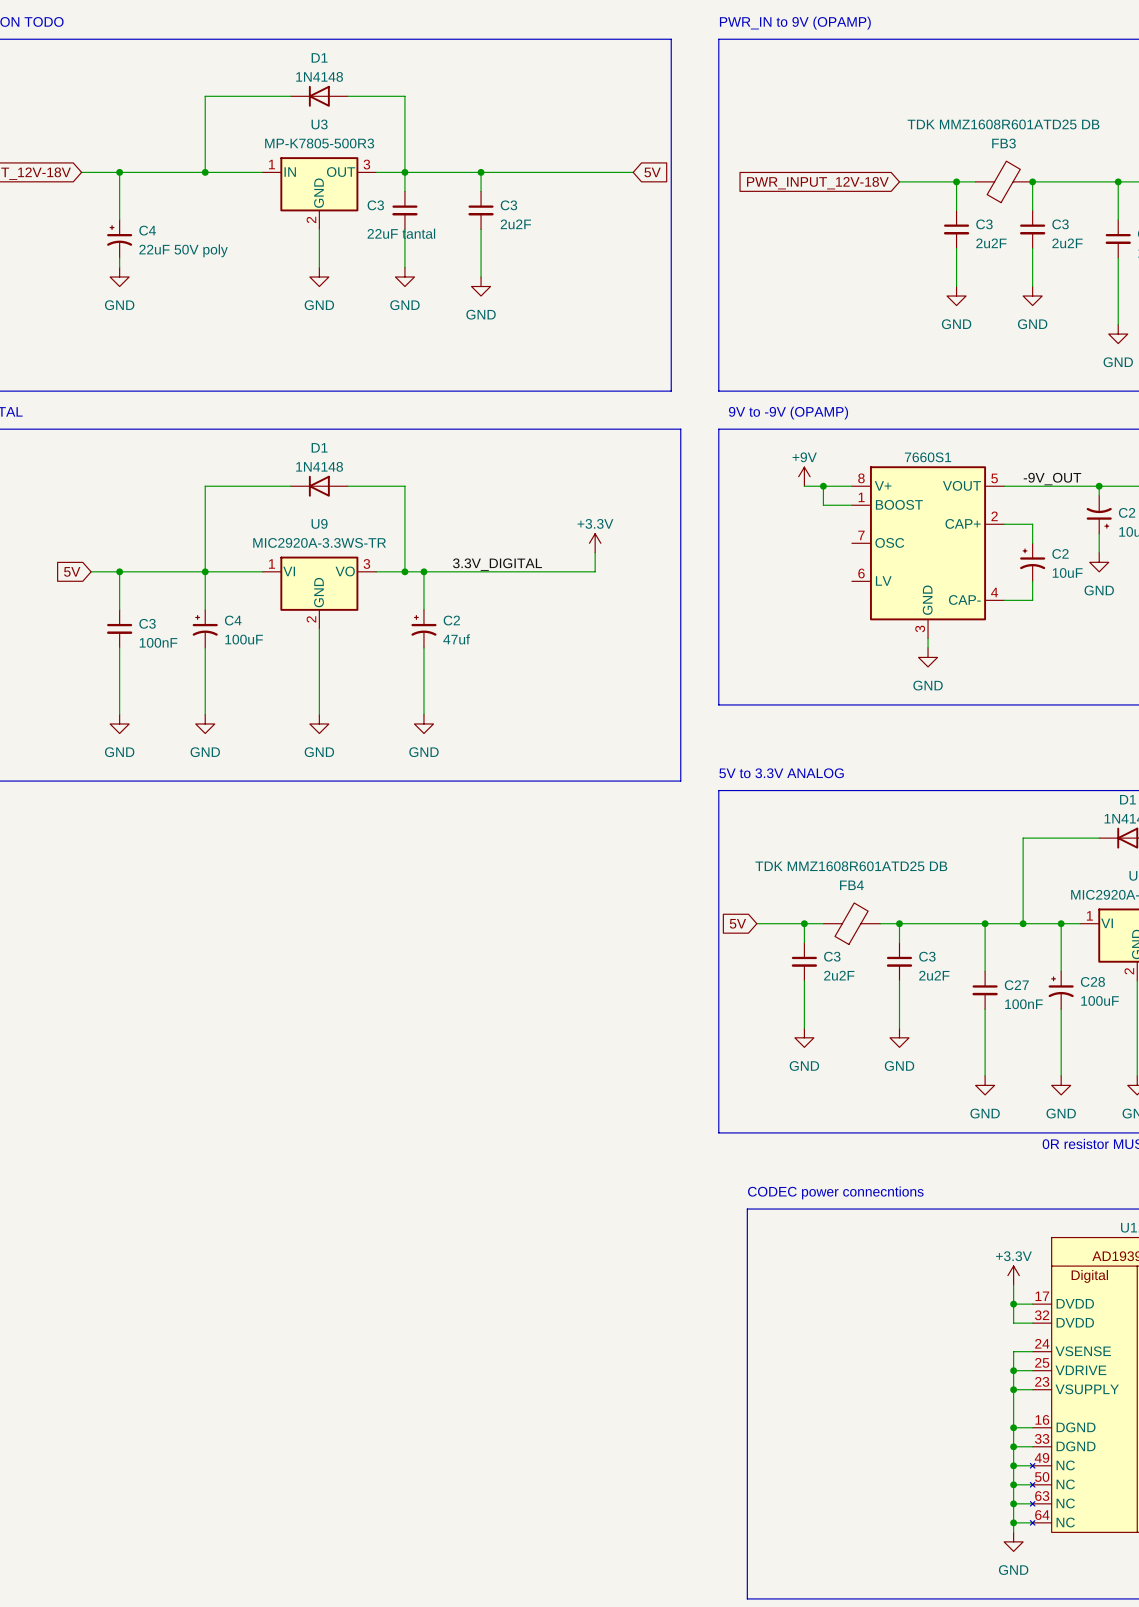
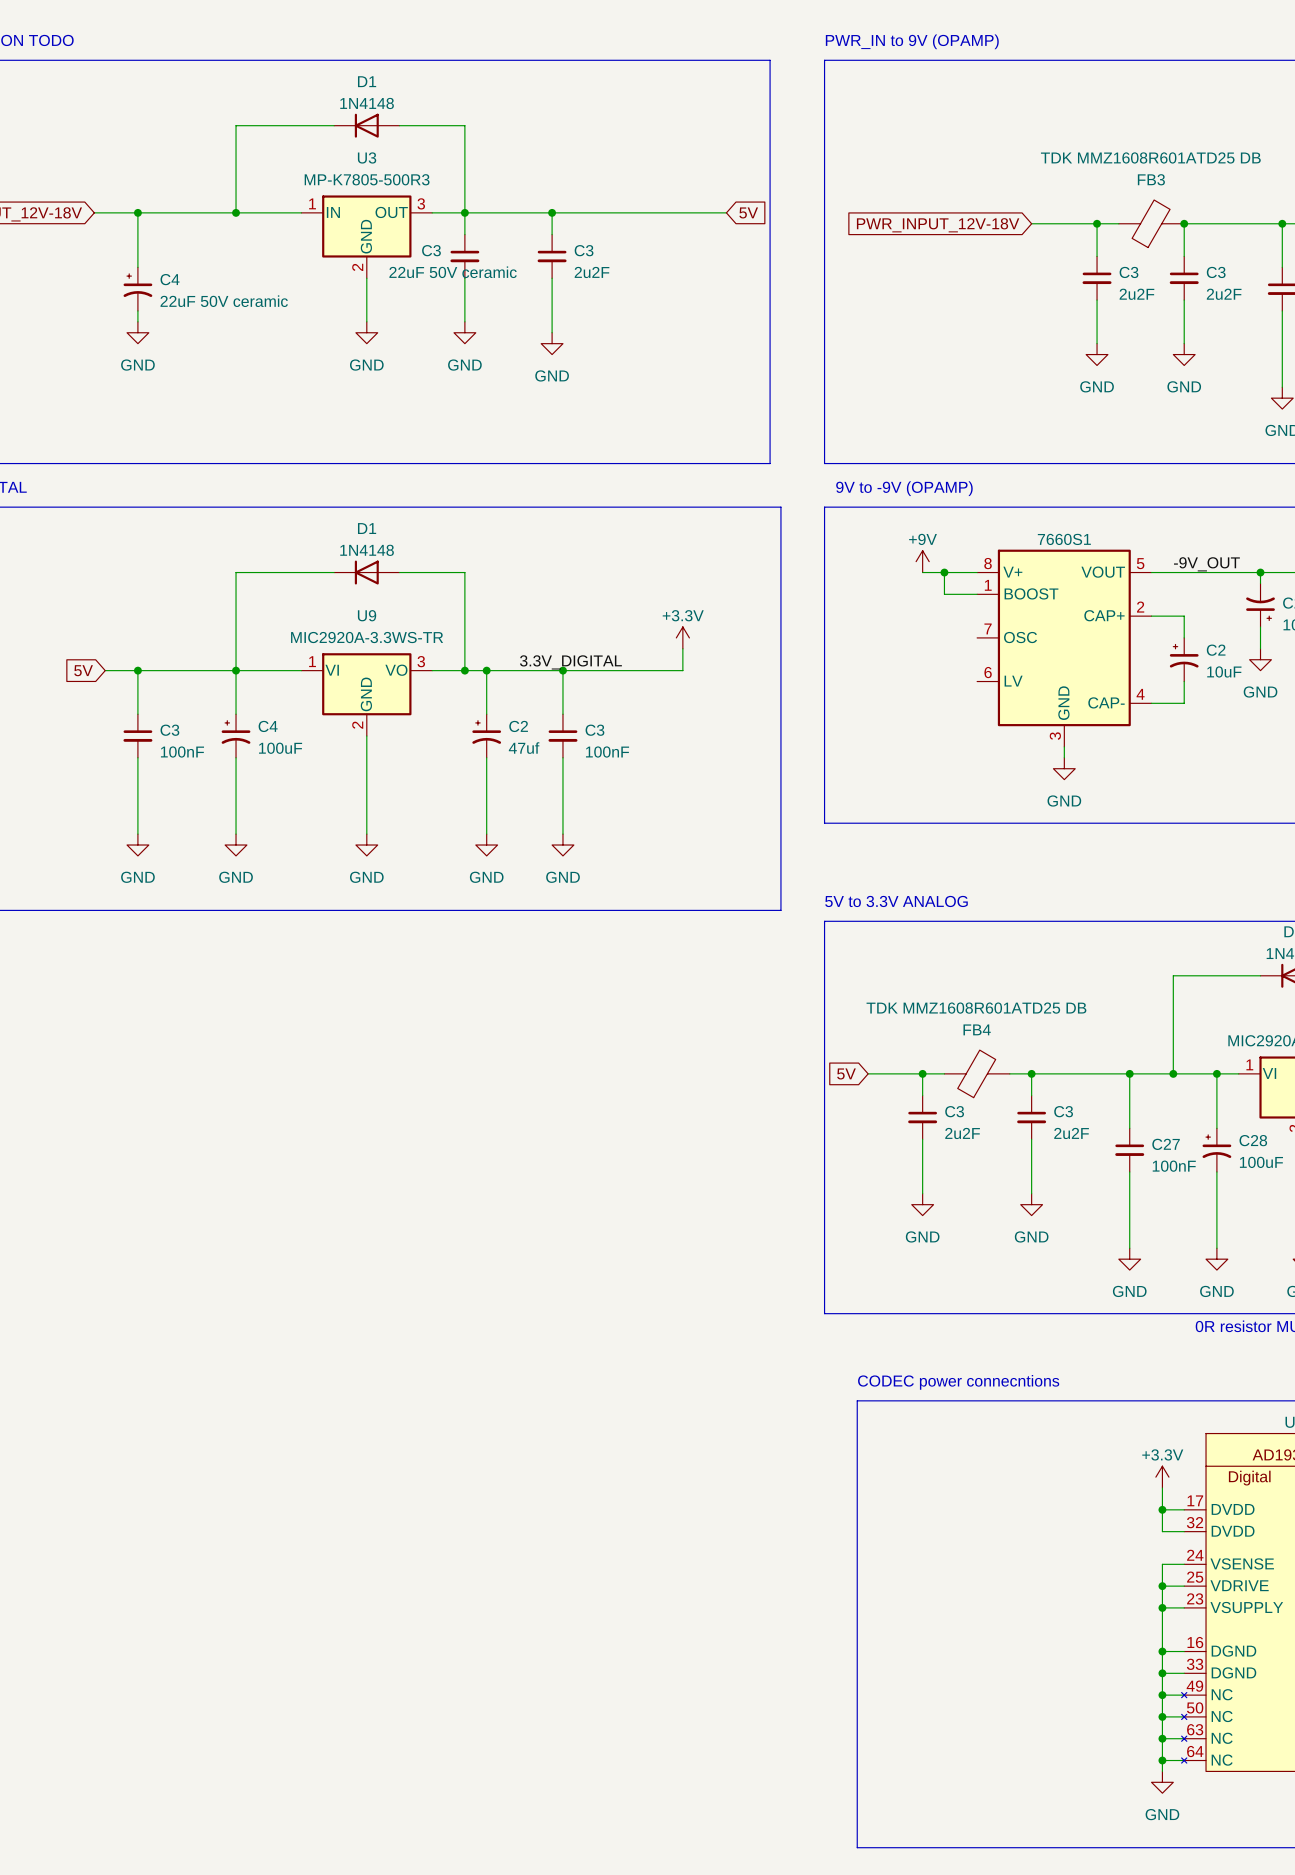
C3 value: 22uF tantal (401, 233) -> 22uF 50V ceramic (453, 272)
C4 value: 22uF 50V poly (183, 250) -> 22uF 50V ceramic (224, 301)
wire: none -> (562, 670) (562, 714)
junction: none -> (562, 670)
C3: none -> 100nF (562, 736)
wire: none -> (562, 757) (562, 834)
power symbol: none -> GND (562, 845)

